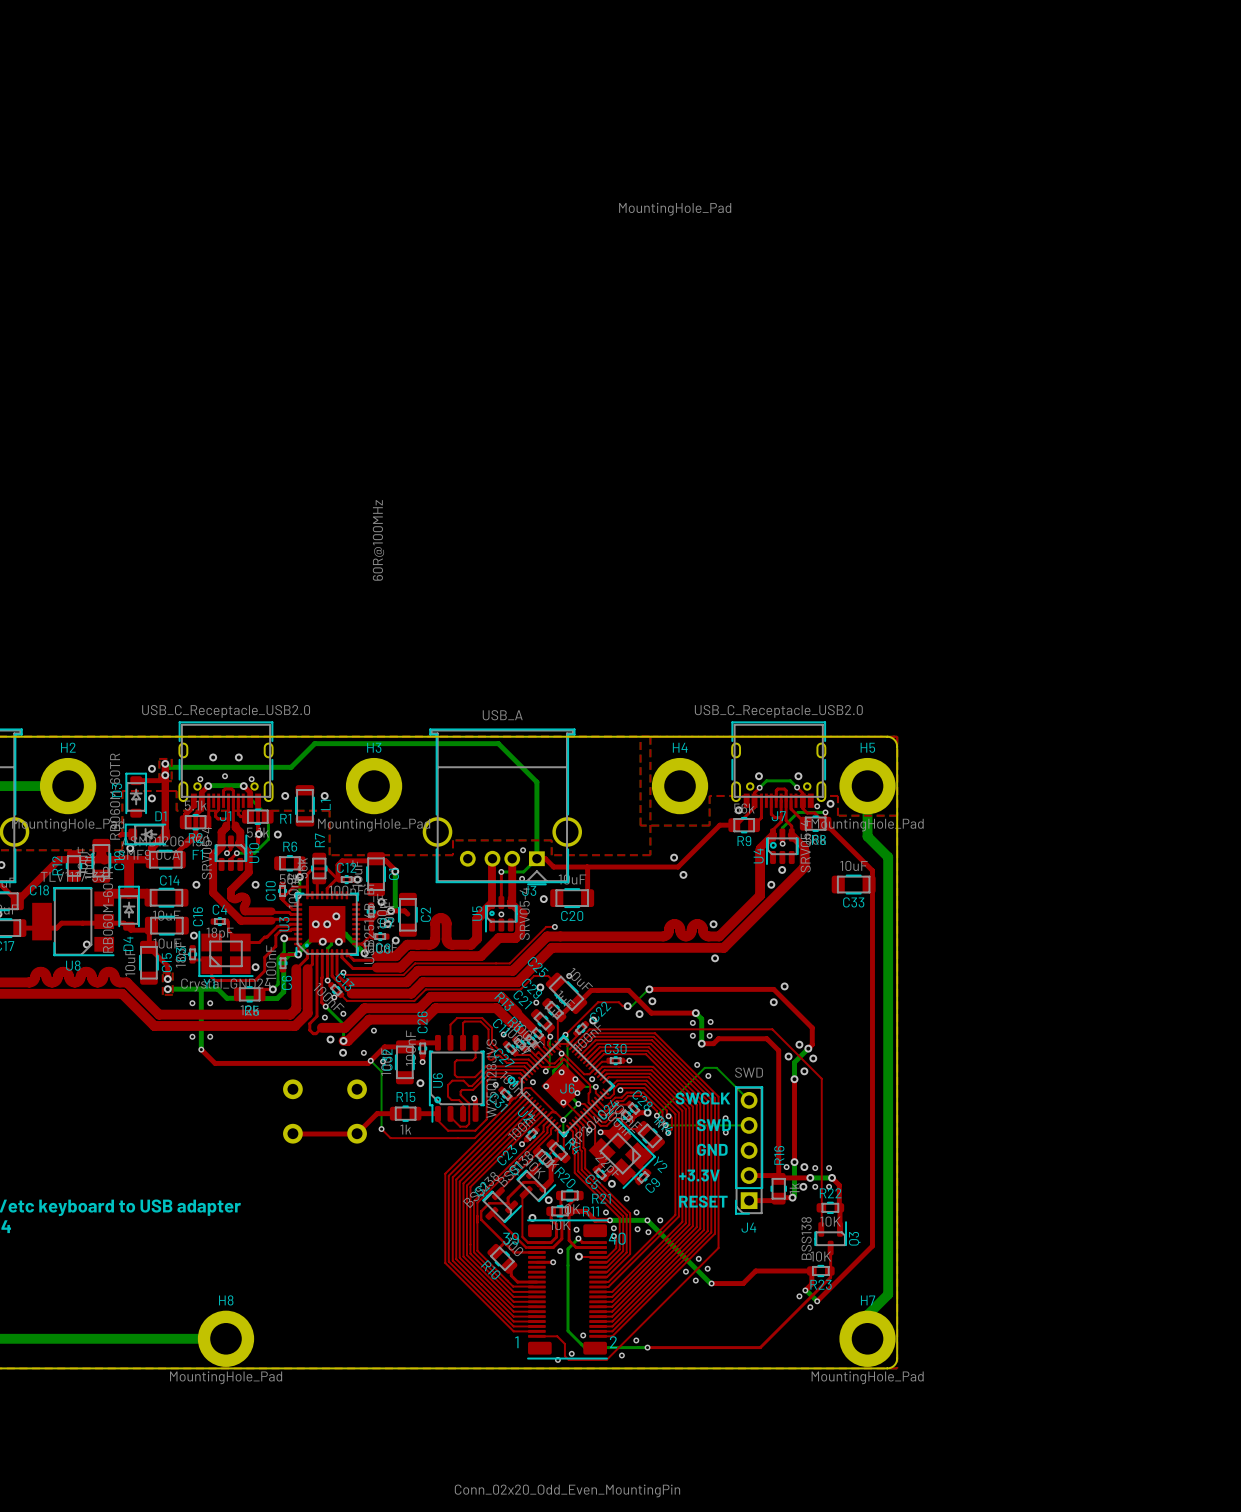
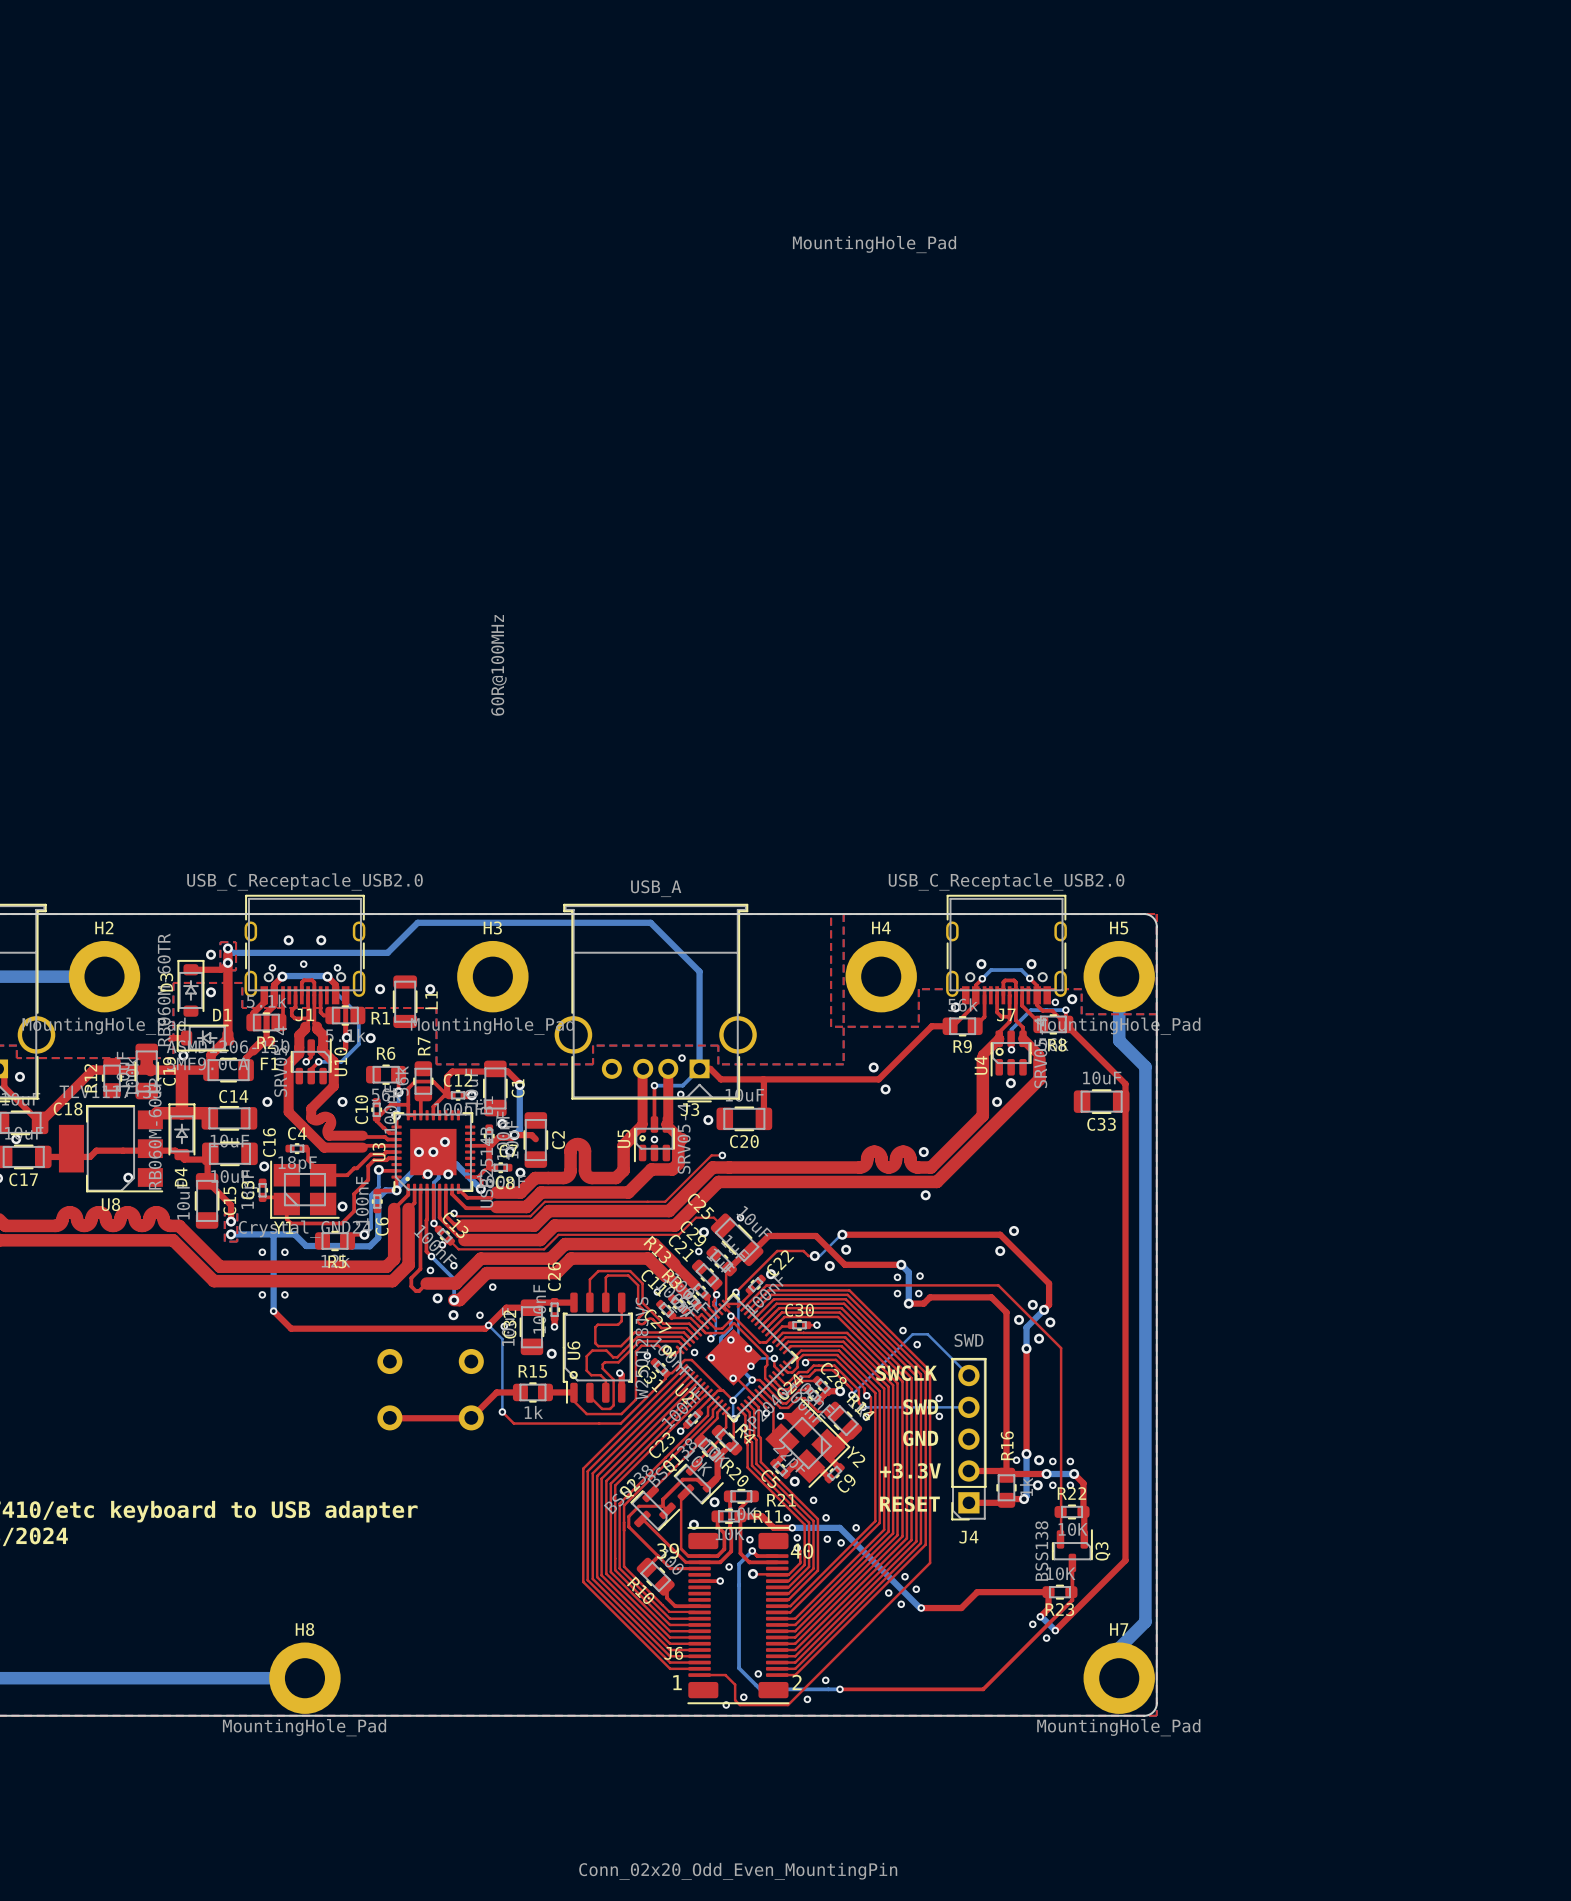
J6 name position: J6 (567, 1088) -> J6 (673, 1653)
via: (647, 1220) -> none

